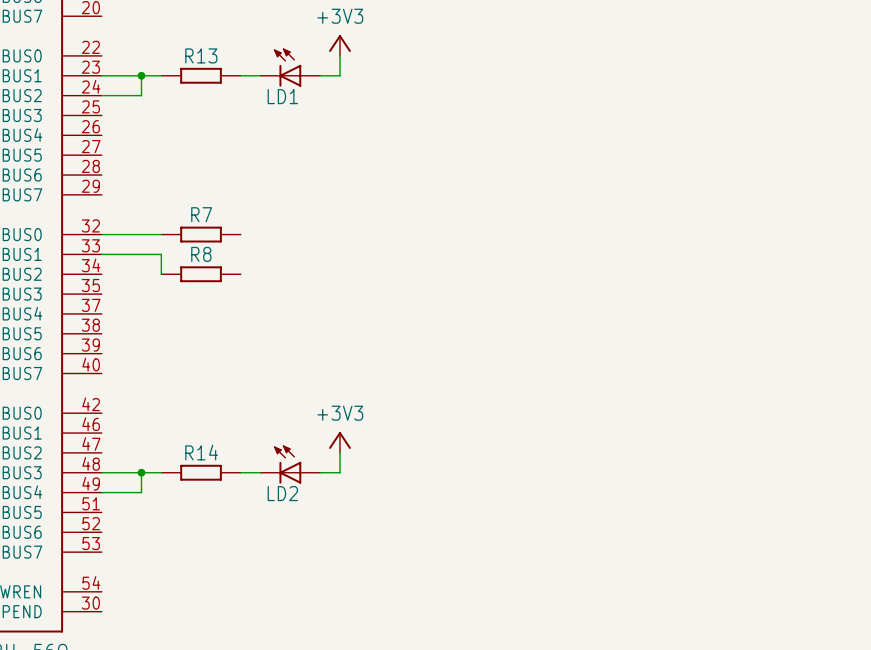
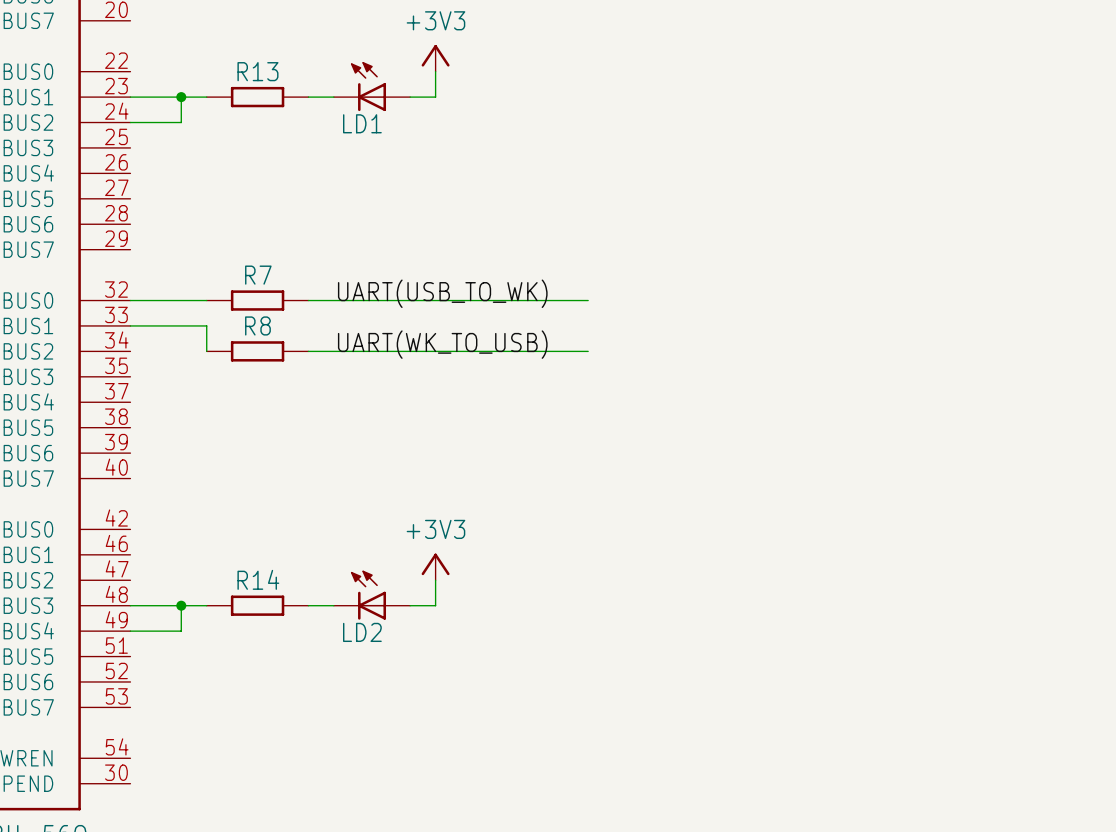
label: none -> UART(USB_TO_WK) (442, 293)
wire: none -> (308, 300) (588, 300)
label: none -> UART(WK_TO_USB) (442, 344)
wire: none -> (308, 351) (588, 351)

